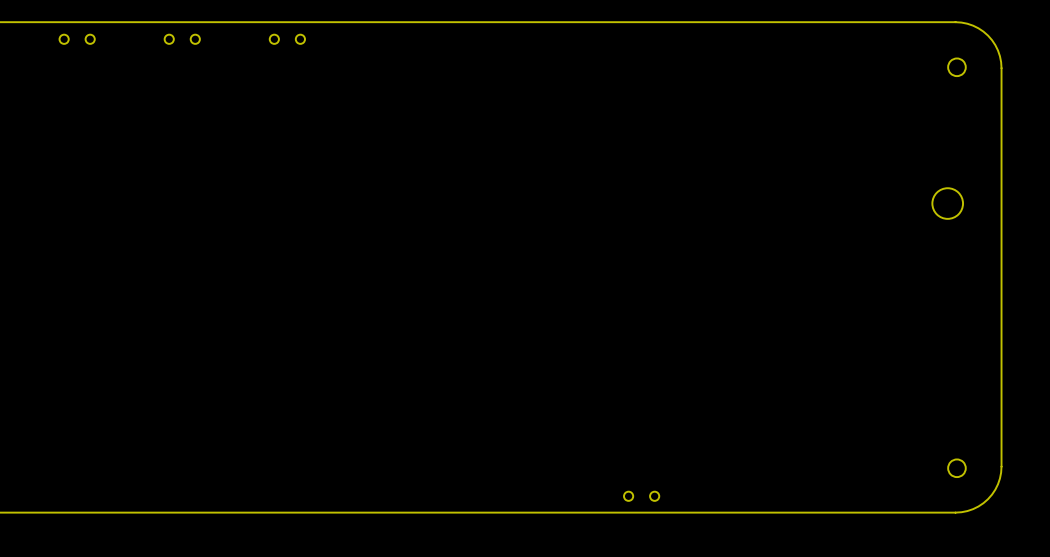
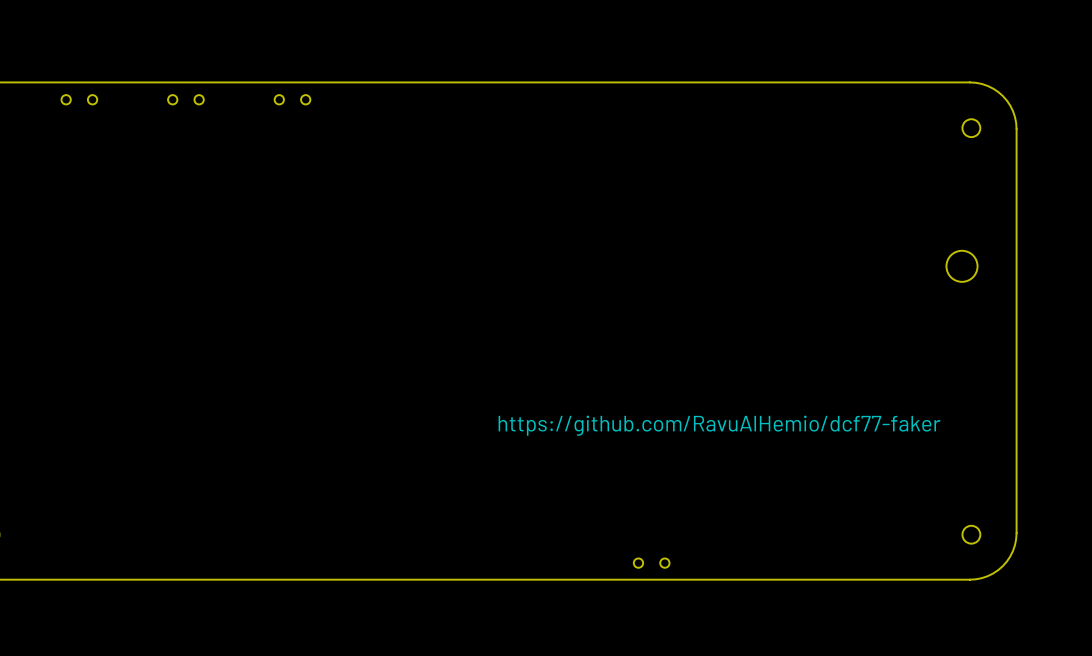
text: none -> https://github.com/RavuAlHemio/dcf77-faker (719, 425)

